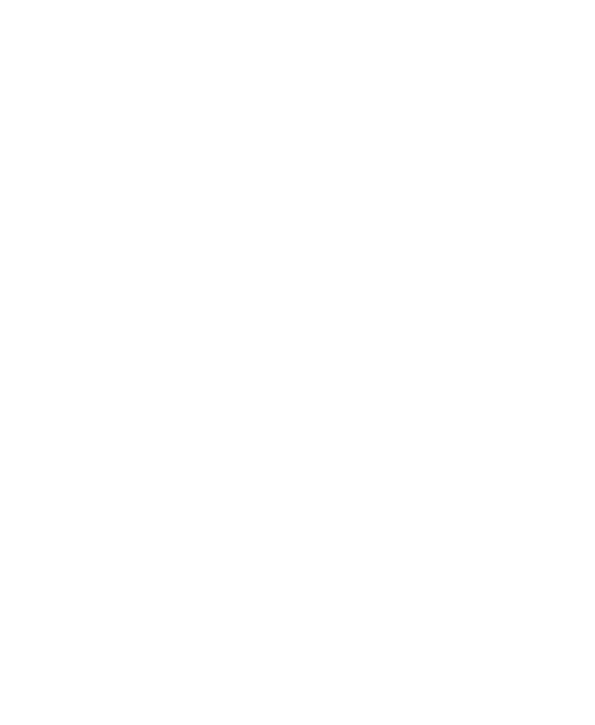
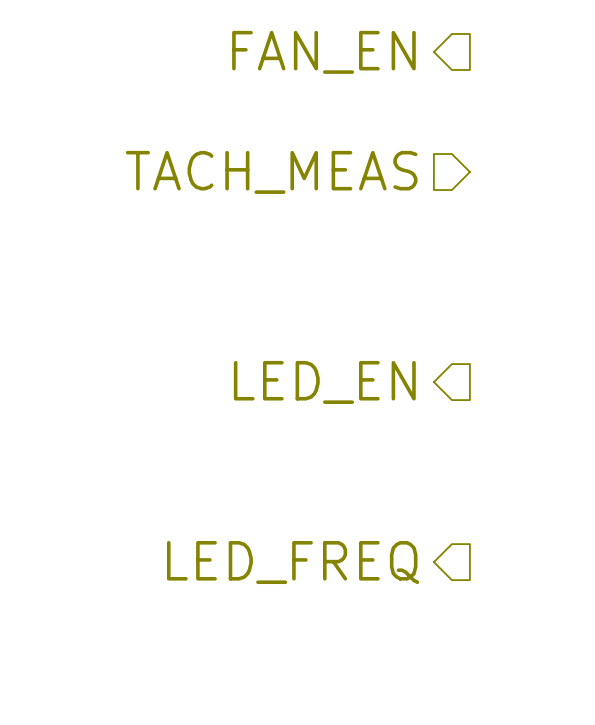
hierarchical label: none -> FAN_EN (323, 52)
hierarchical label: none -> TACH_MEAS (271, 172)
hierarchical label: none -> LED_EN (324, 382)
hierarchical label: none -> LED_FREQ (293, 562)

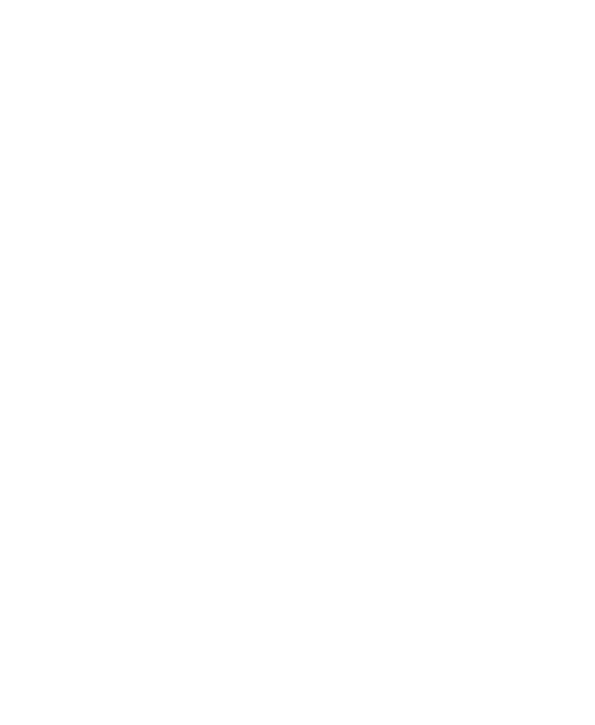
hierarchical label: FAN_EN (323, 52) -> none
hierarchical label: TACH_MEAS (271, 172) -> none
hierarchical label: LED_EN (324, 382) -> none
hierarchical label: LED_FREQ (293, 562) -> none

